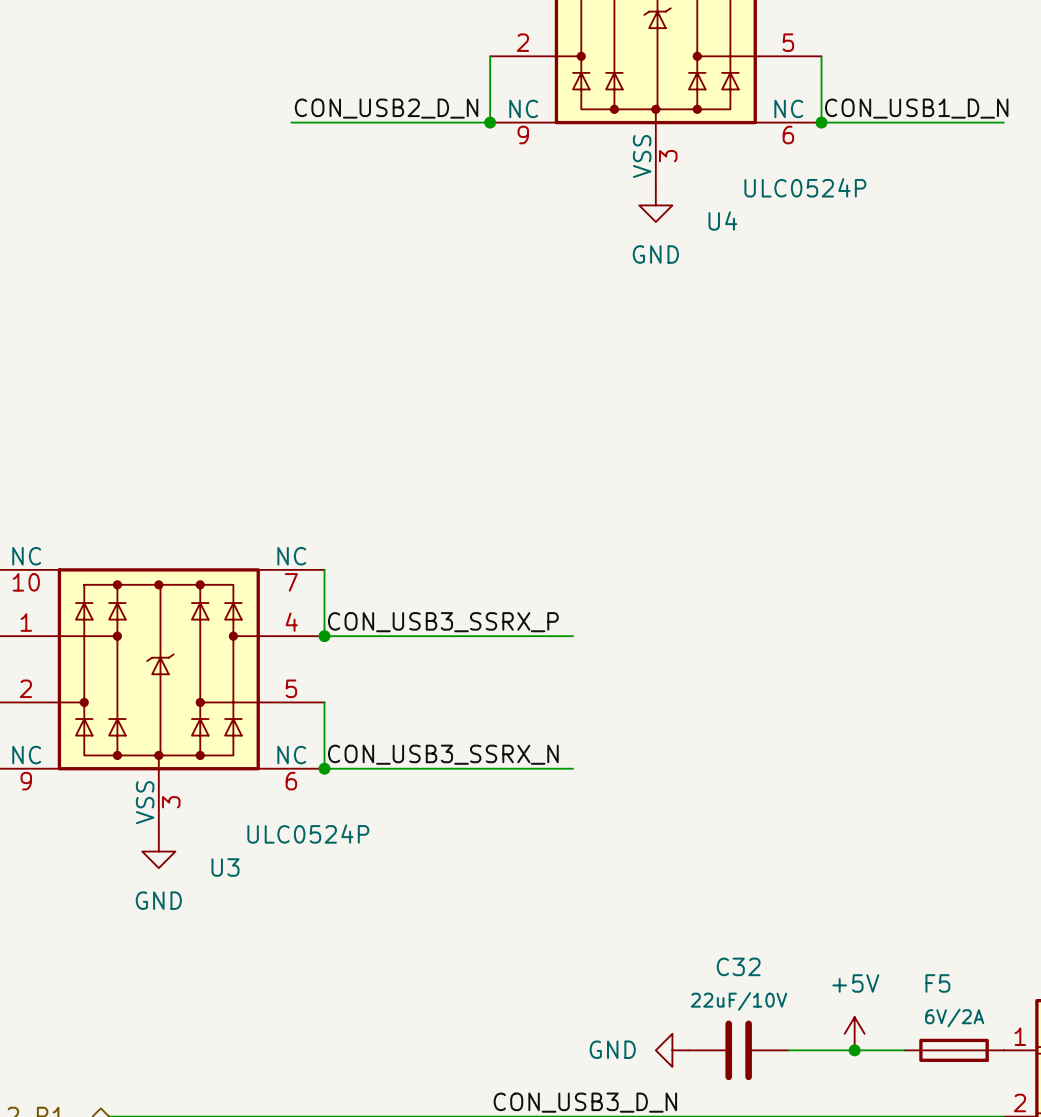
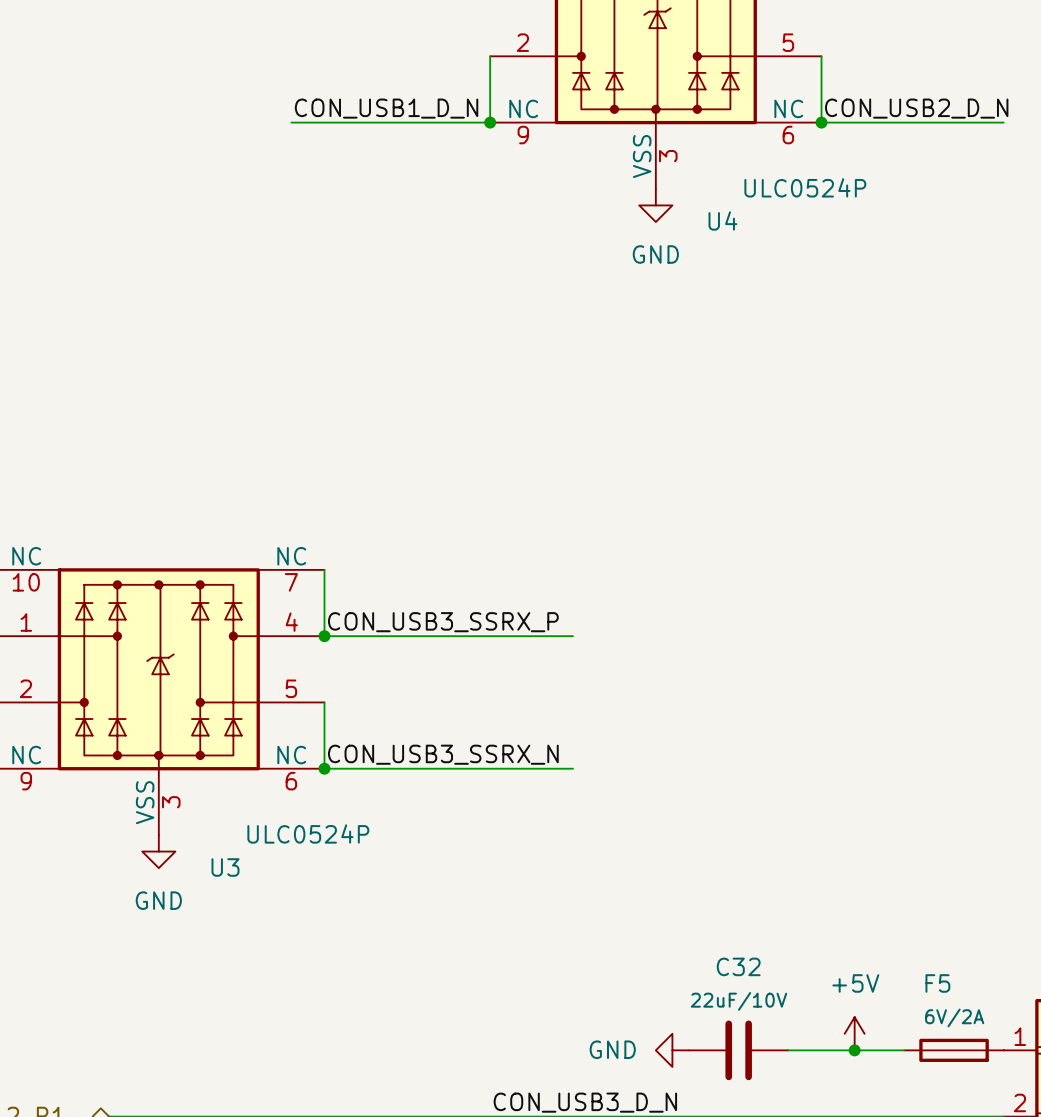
label: CON_USB2_D_N (386, 108) -> CON_USB1_D_N (386, 108)
label: CON_USB1_D_N (916, 108) -> CON_USB2_D_N (916, 108)

